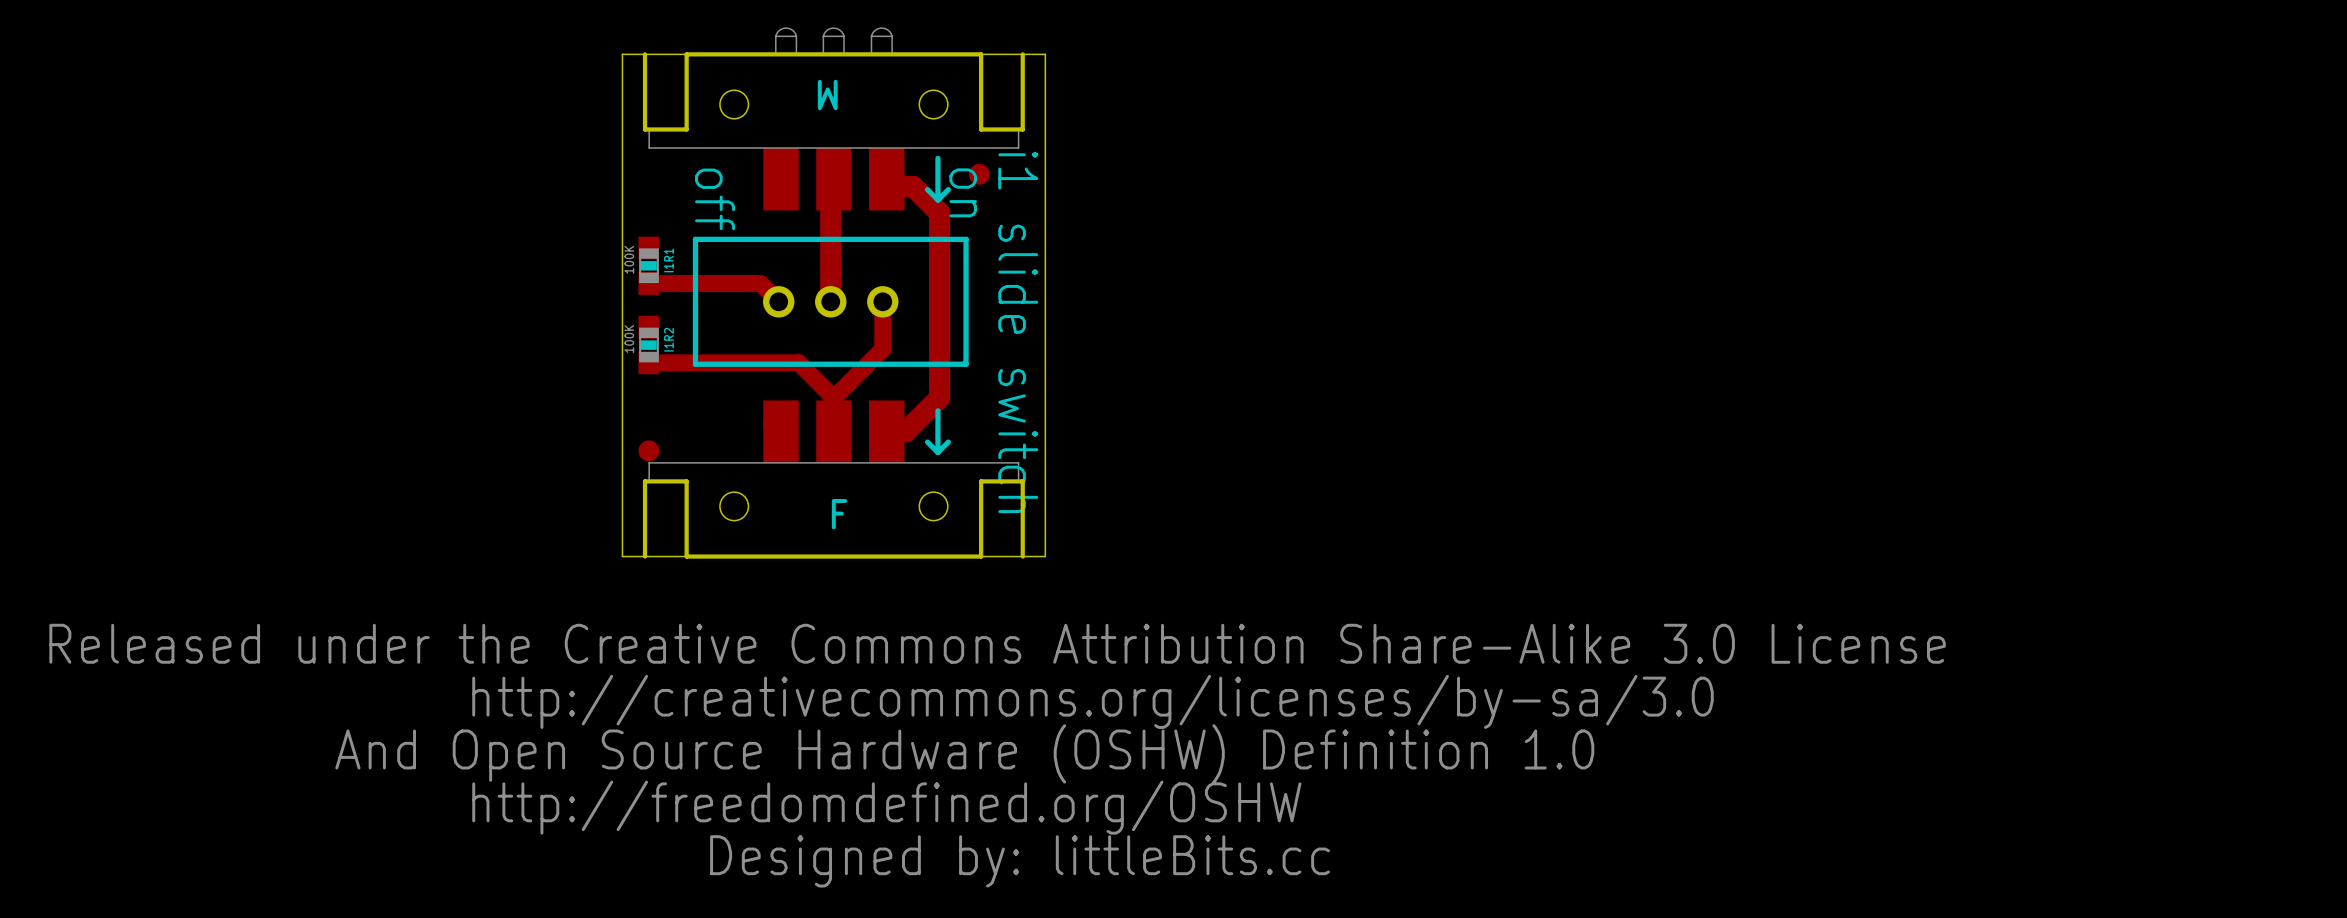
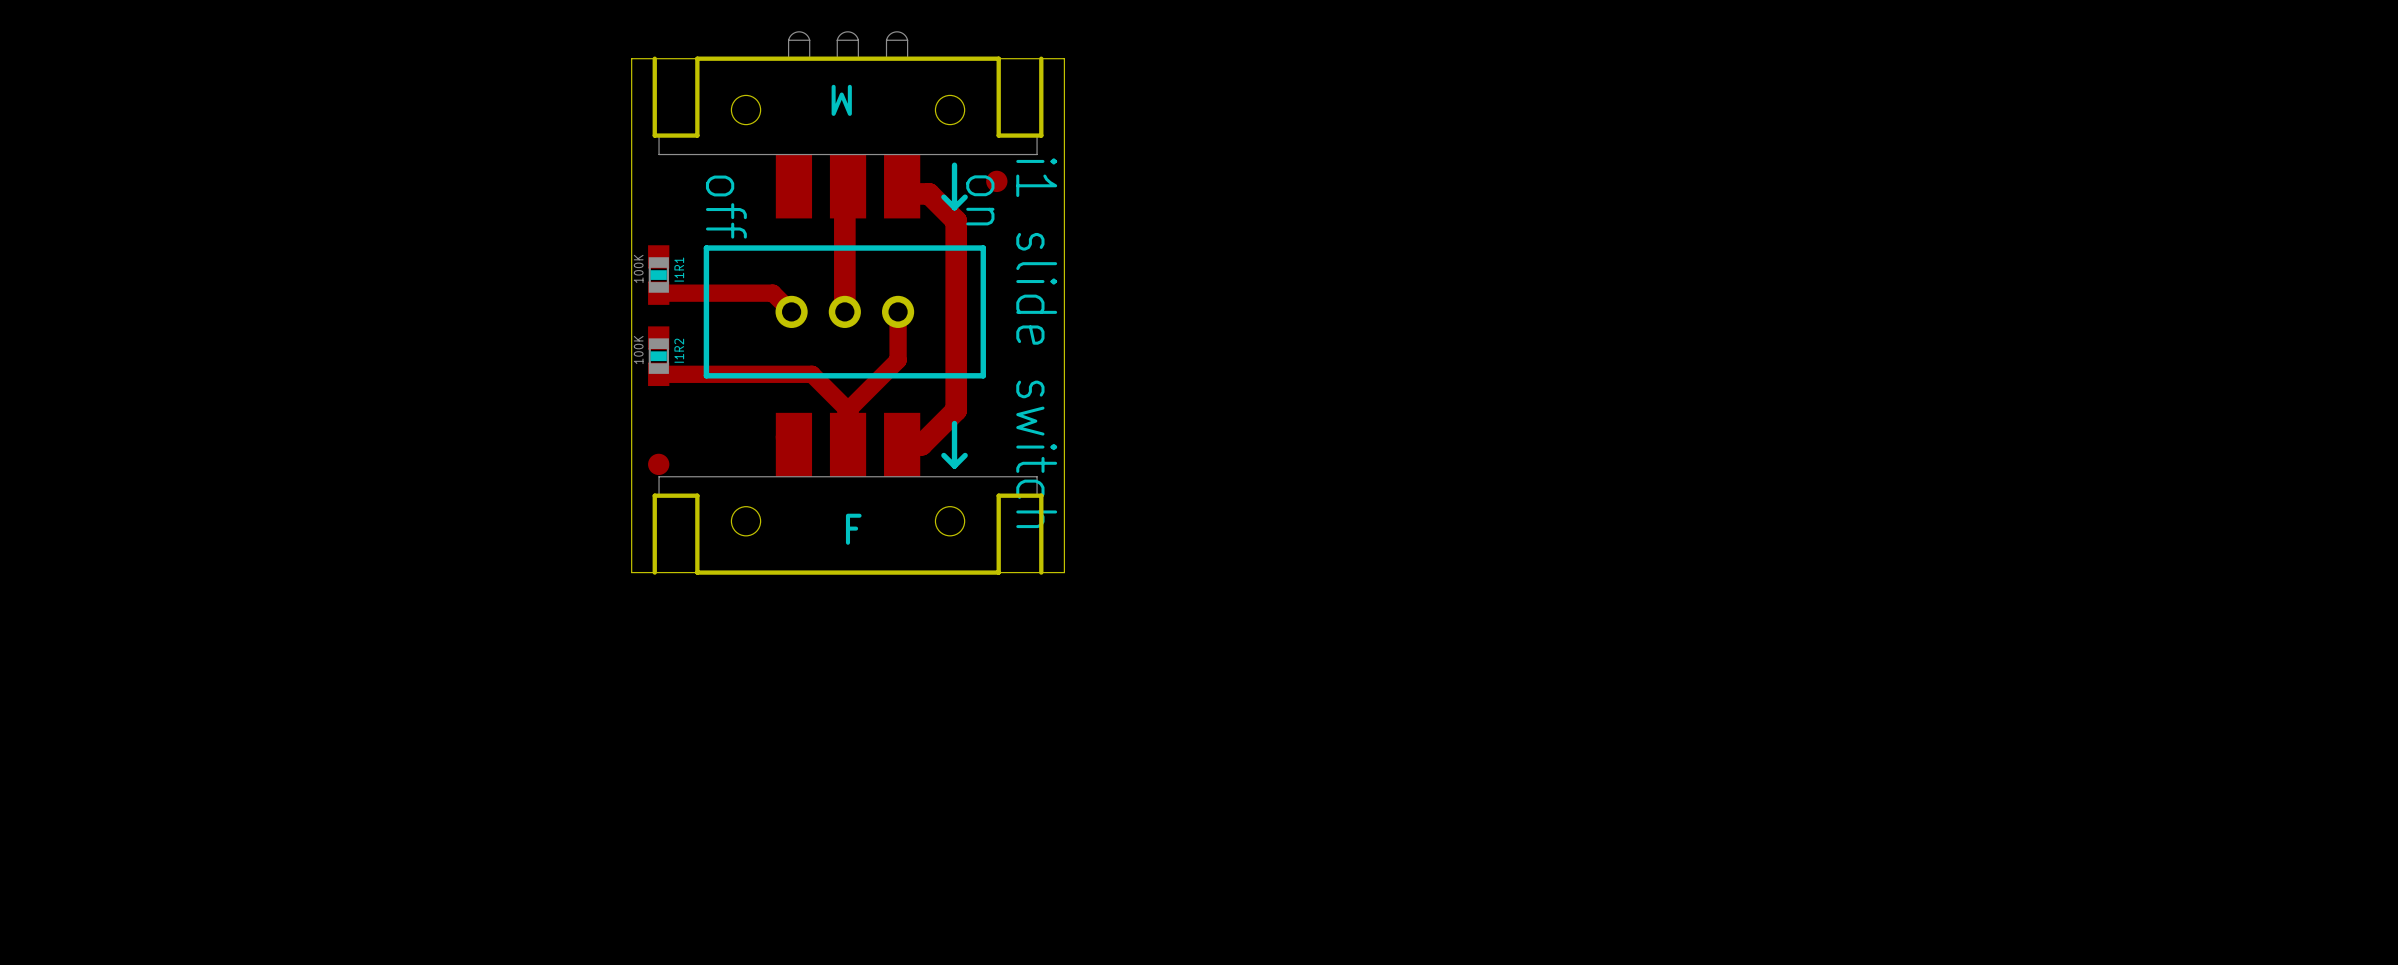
drawing: [49, 623, 1946, 888] -> none

